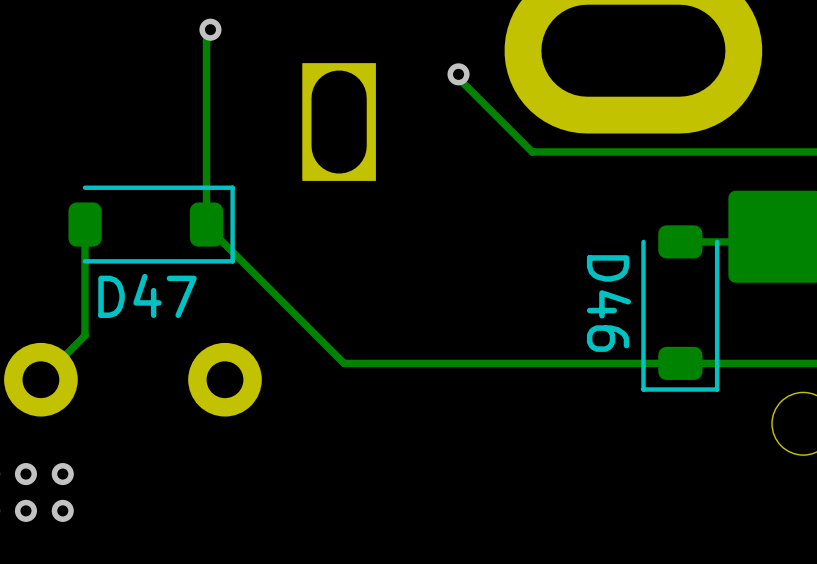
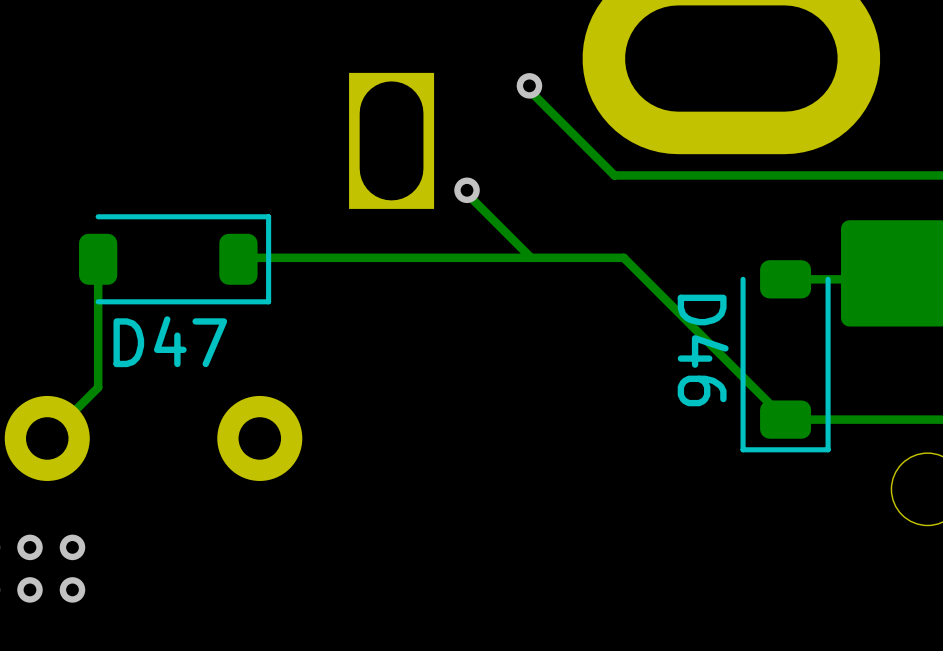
track: (210, 29) (210, 36) (206, 40) (206, 225) (344, 363) (680, 363) -> (239, 257) (623, 257) (785, 419)
via: (210, 29) -> none
track: none -> (467, 190) (467, 193) (531, 257)
via: none -> (467, 190)

